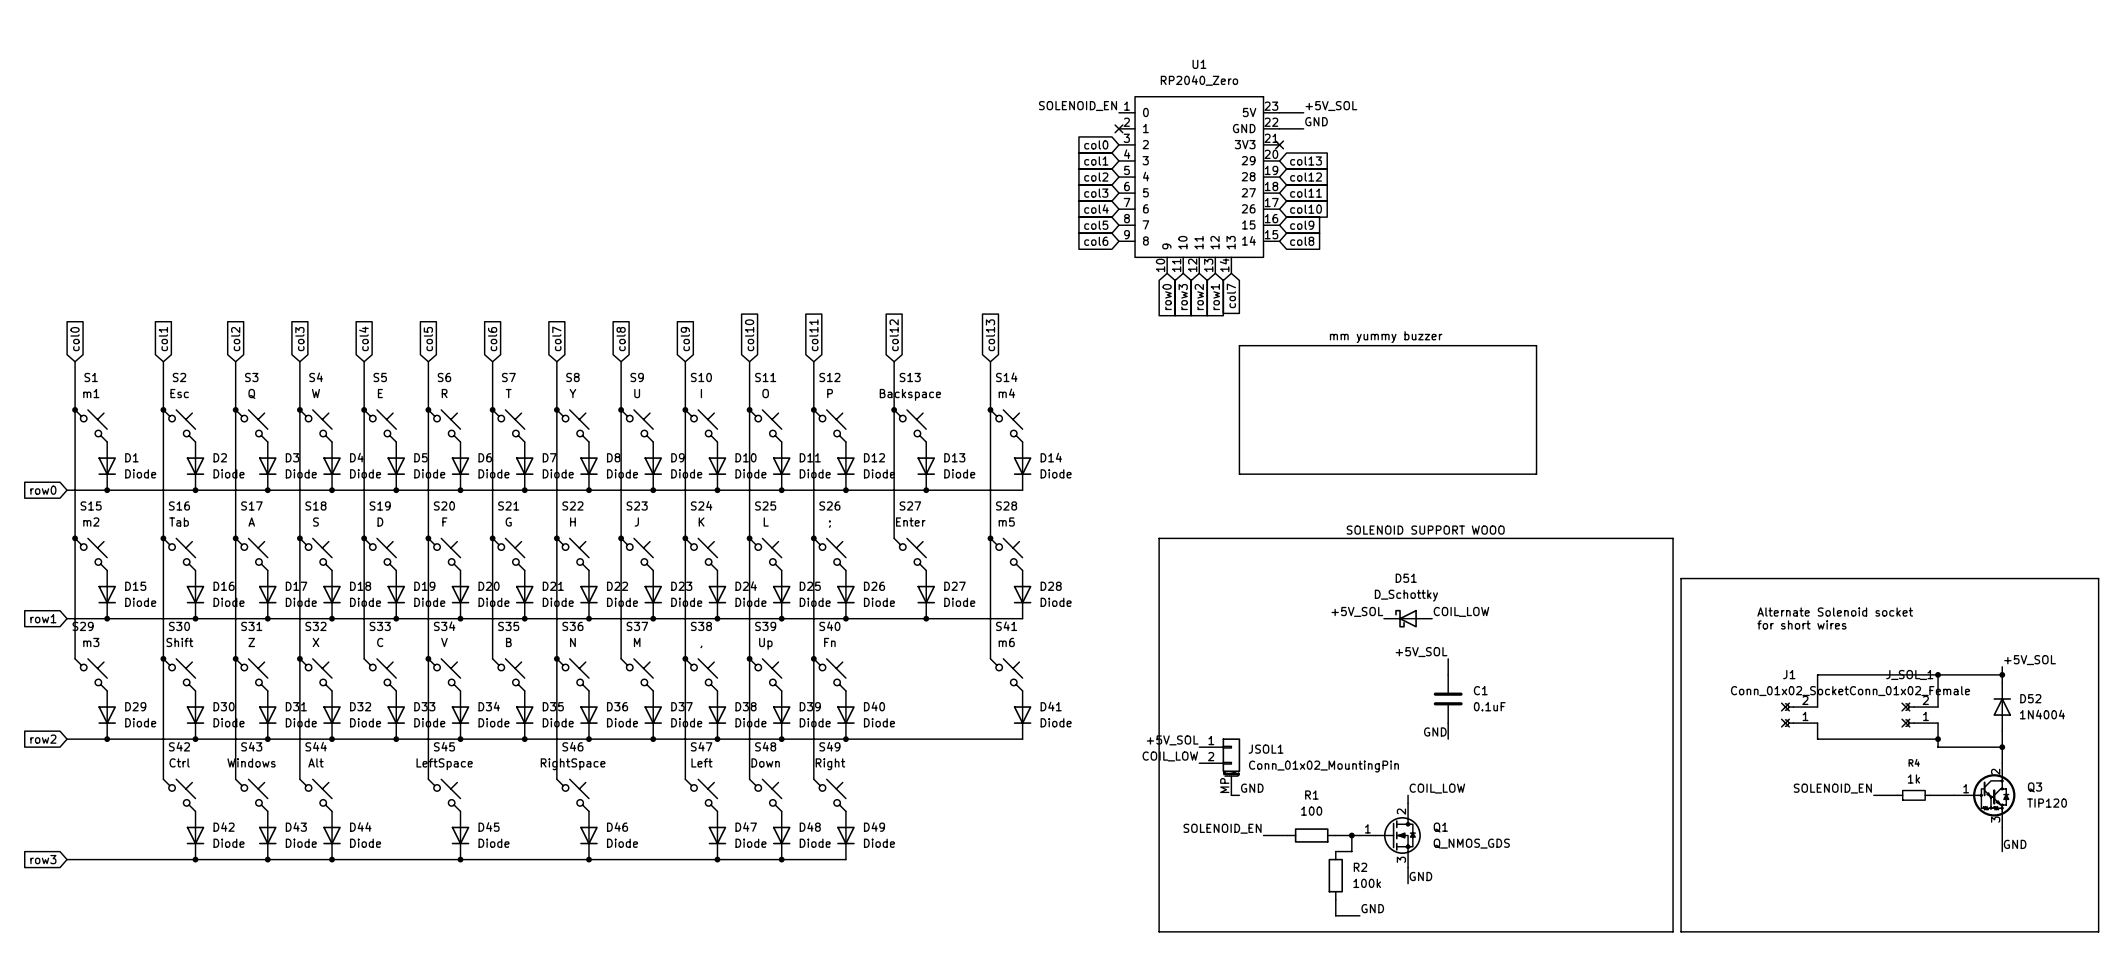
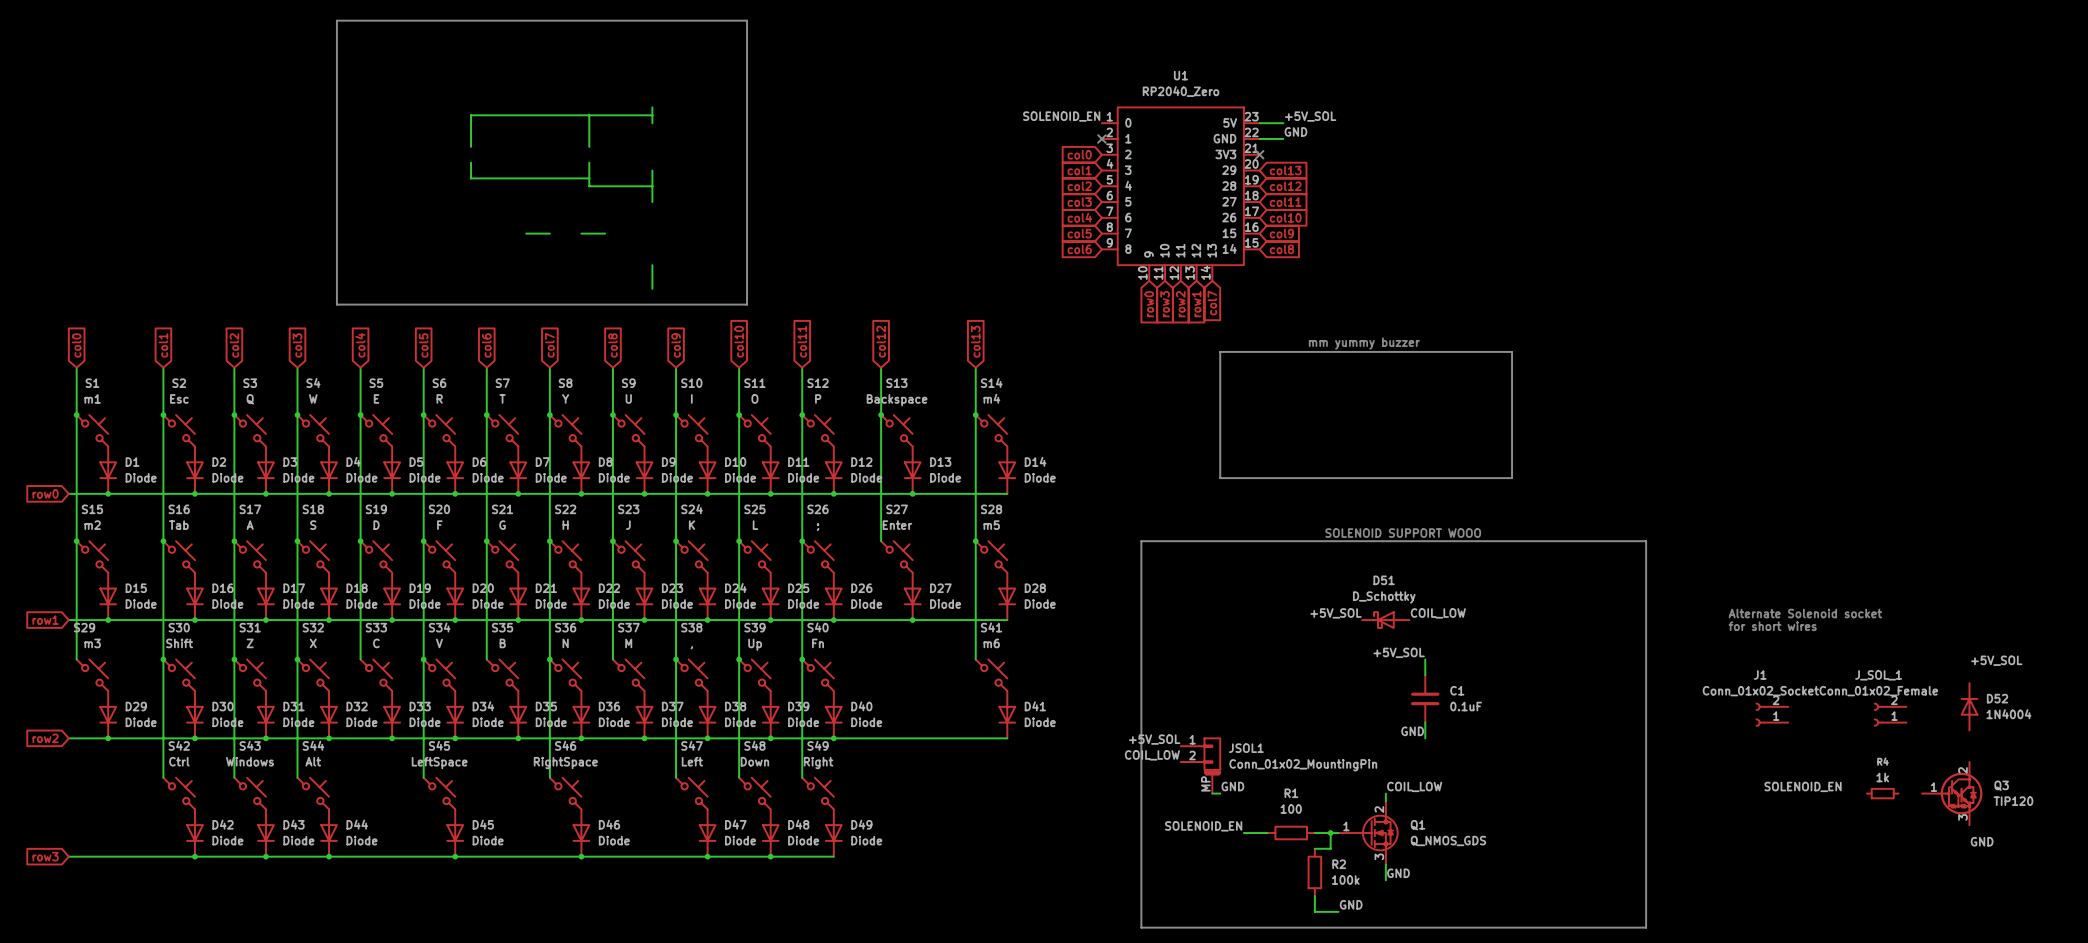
line: none -> (336, 20) (747, 20) (747, 304) (336, 304) (336, 20)
wire: none -> (652, 107) (652, 123)
wire: none -> (589, 115) (589, 146)
wire: none -> (652, 115) (471, 115) (471, 146)
wire: none -> (471, 162) (471, 178) (589, 178)
wire: none -> (589, 162) (589, 186) (652, 186)
wire: none -> (652, 170) (652, 202)
wire: none -> (526, 233) (549, 233)
wire: none -> (581, 233) (605, 233)
wire: none -> (652, 265) (652, 288)
line: (1681, 578) (2098, 578) (2098, 931) (1681, 931) (1681, 578) -> none
wire: (2002, 666) (2002, 682) -> none
wire: (1938, 674) (1938, 707) -> none
junction: (1938, 674) -> none
wire: (2002, 674) (1817, 674) (1817, 707) -> none
junction: (2002, 674) -> none
no-connect mark: (1785, 707) -> none
no-connect mark: (1905, 707) -> none
no-connect mark: (1785, 723) -> none
wire: (1817, 723) (1817, 739) (1938, 739) -> none
no-connect mark: (1905, 723) -> none
wire: (1938, 723) (1938, 747) (2002, 747) -> none
wire: (2002, 731) (2002, 763) -> none
junction: (1938, 739) -> none
junction: (2002, 747) -> none
wire: (1873, 795) (1897, 795) -> none
wire: (1930, 795) (1954, 795) -> none
wire: (2002, 827) (2002, 851) -> none

